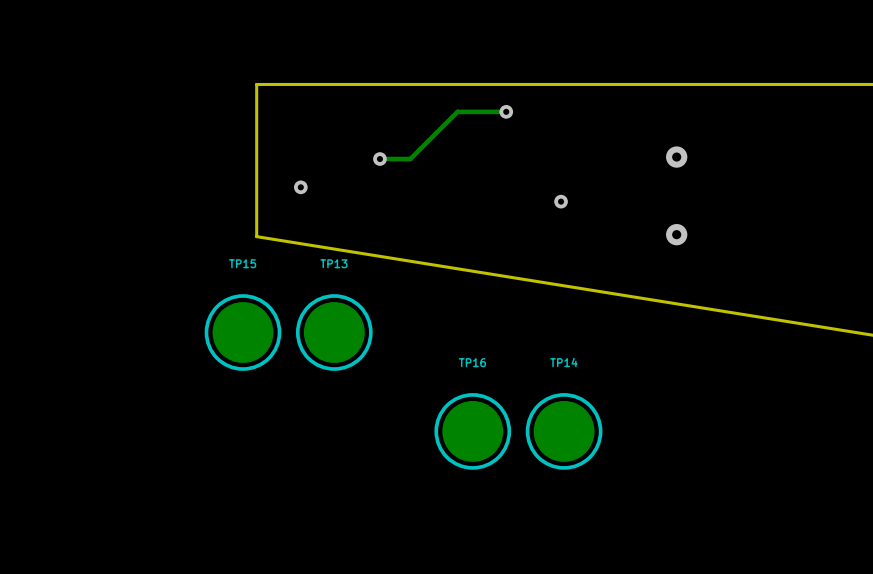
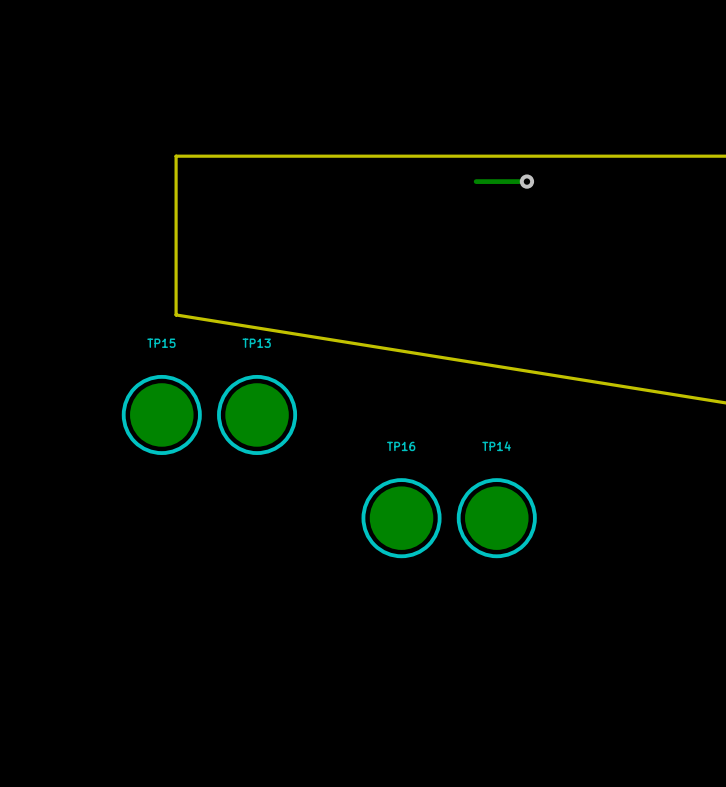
track: none -> (526, 181) (476, 181)
via: none -> (526, 181)
track: (506, 111) (457, 111) (410, 159) (379, 159) -> none
via: (506, 111) -> none
via: (676, 157) -> none
via: (379, 159) -> none
via: (300, 187) -> none
via: (561, 201) -> none
via: (676, 234) -> none

